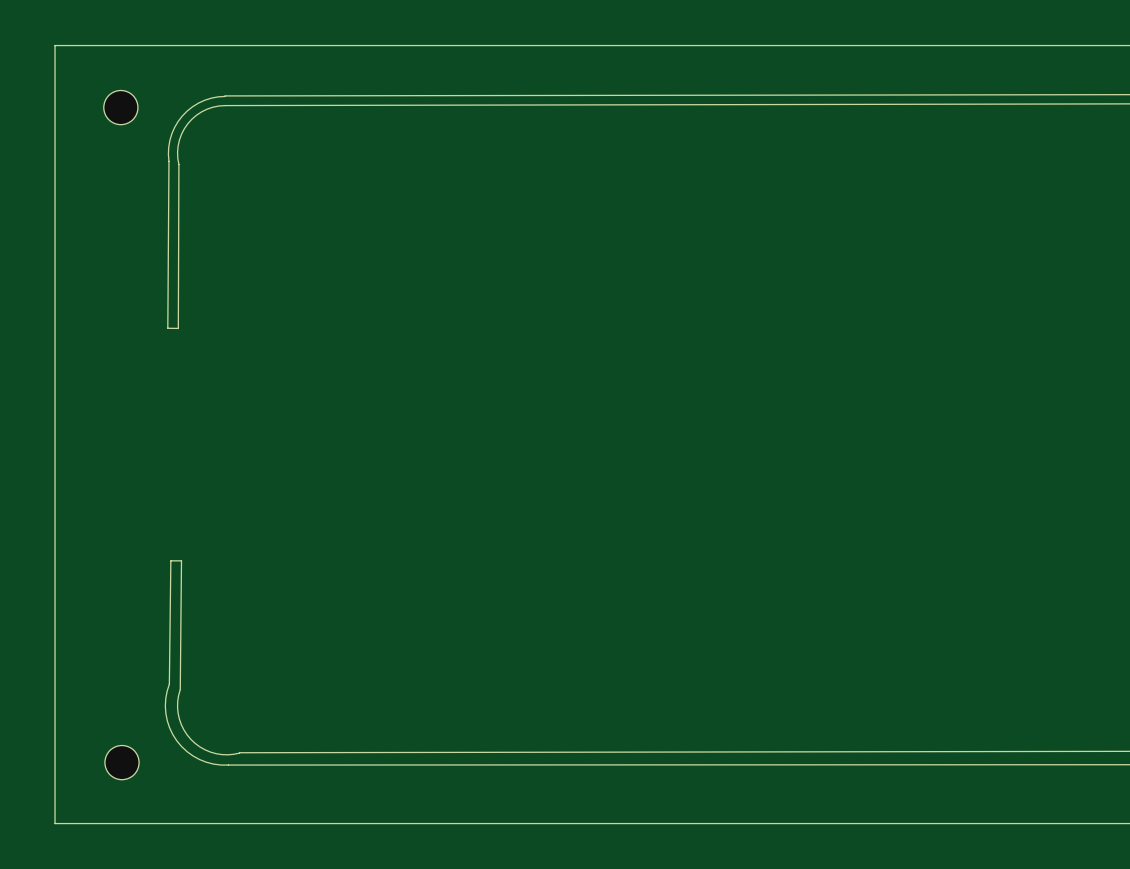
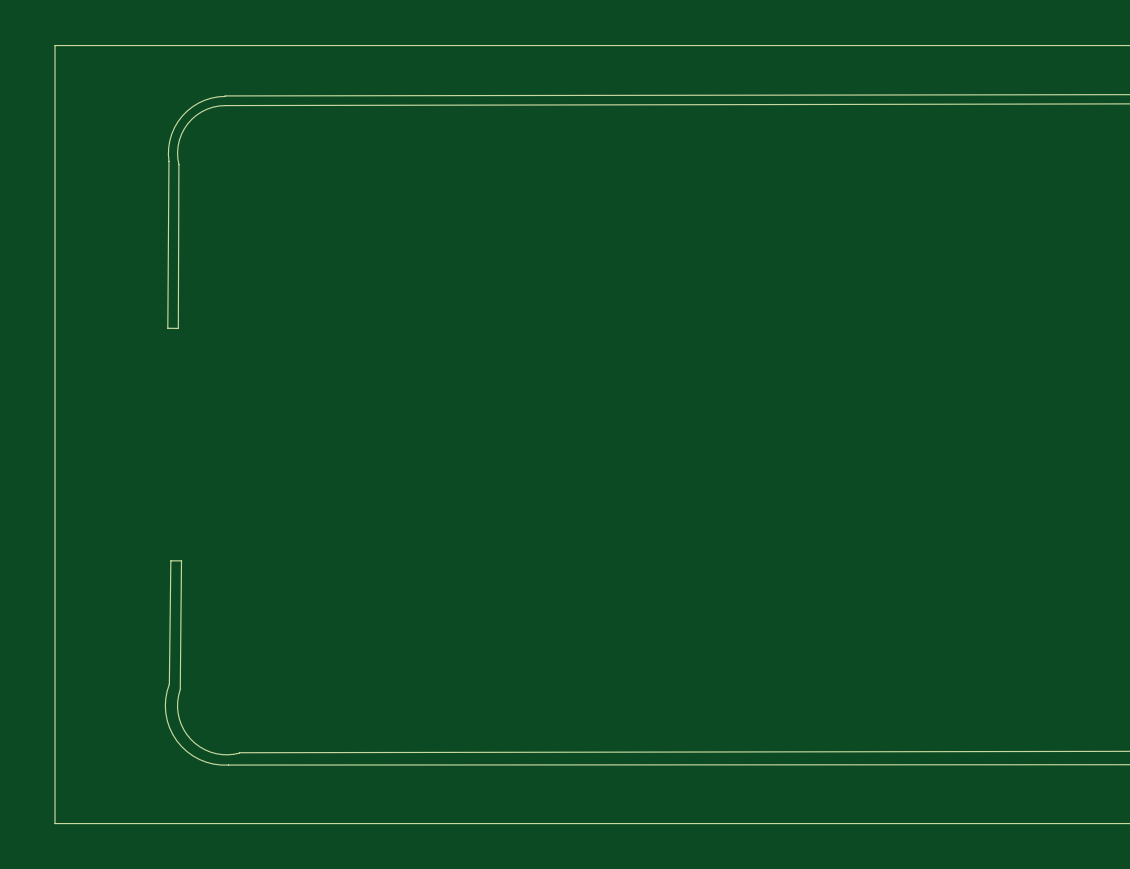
part: (120, 107) -> none
part: (122, 762) -> none

